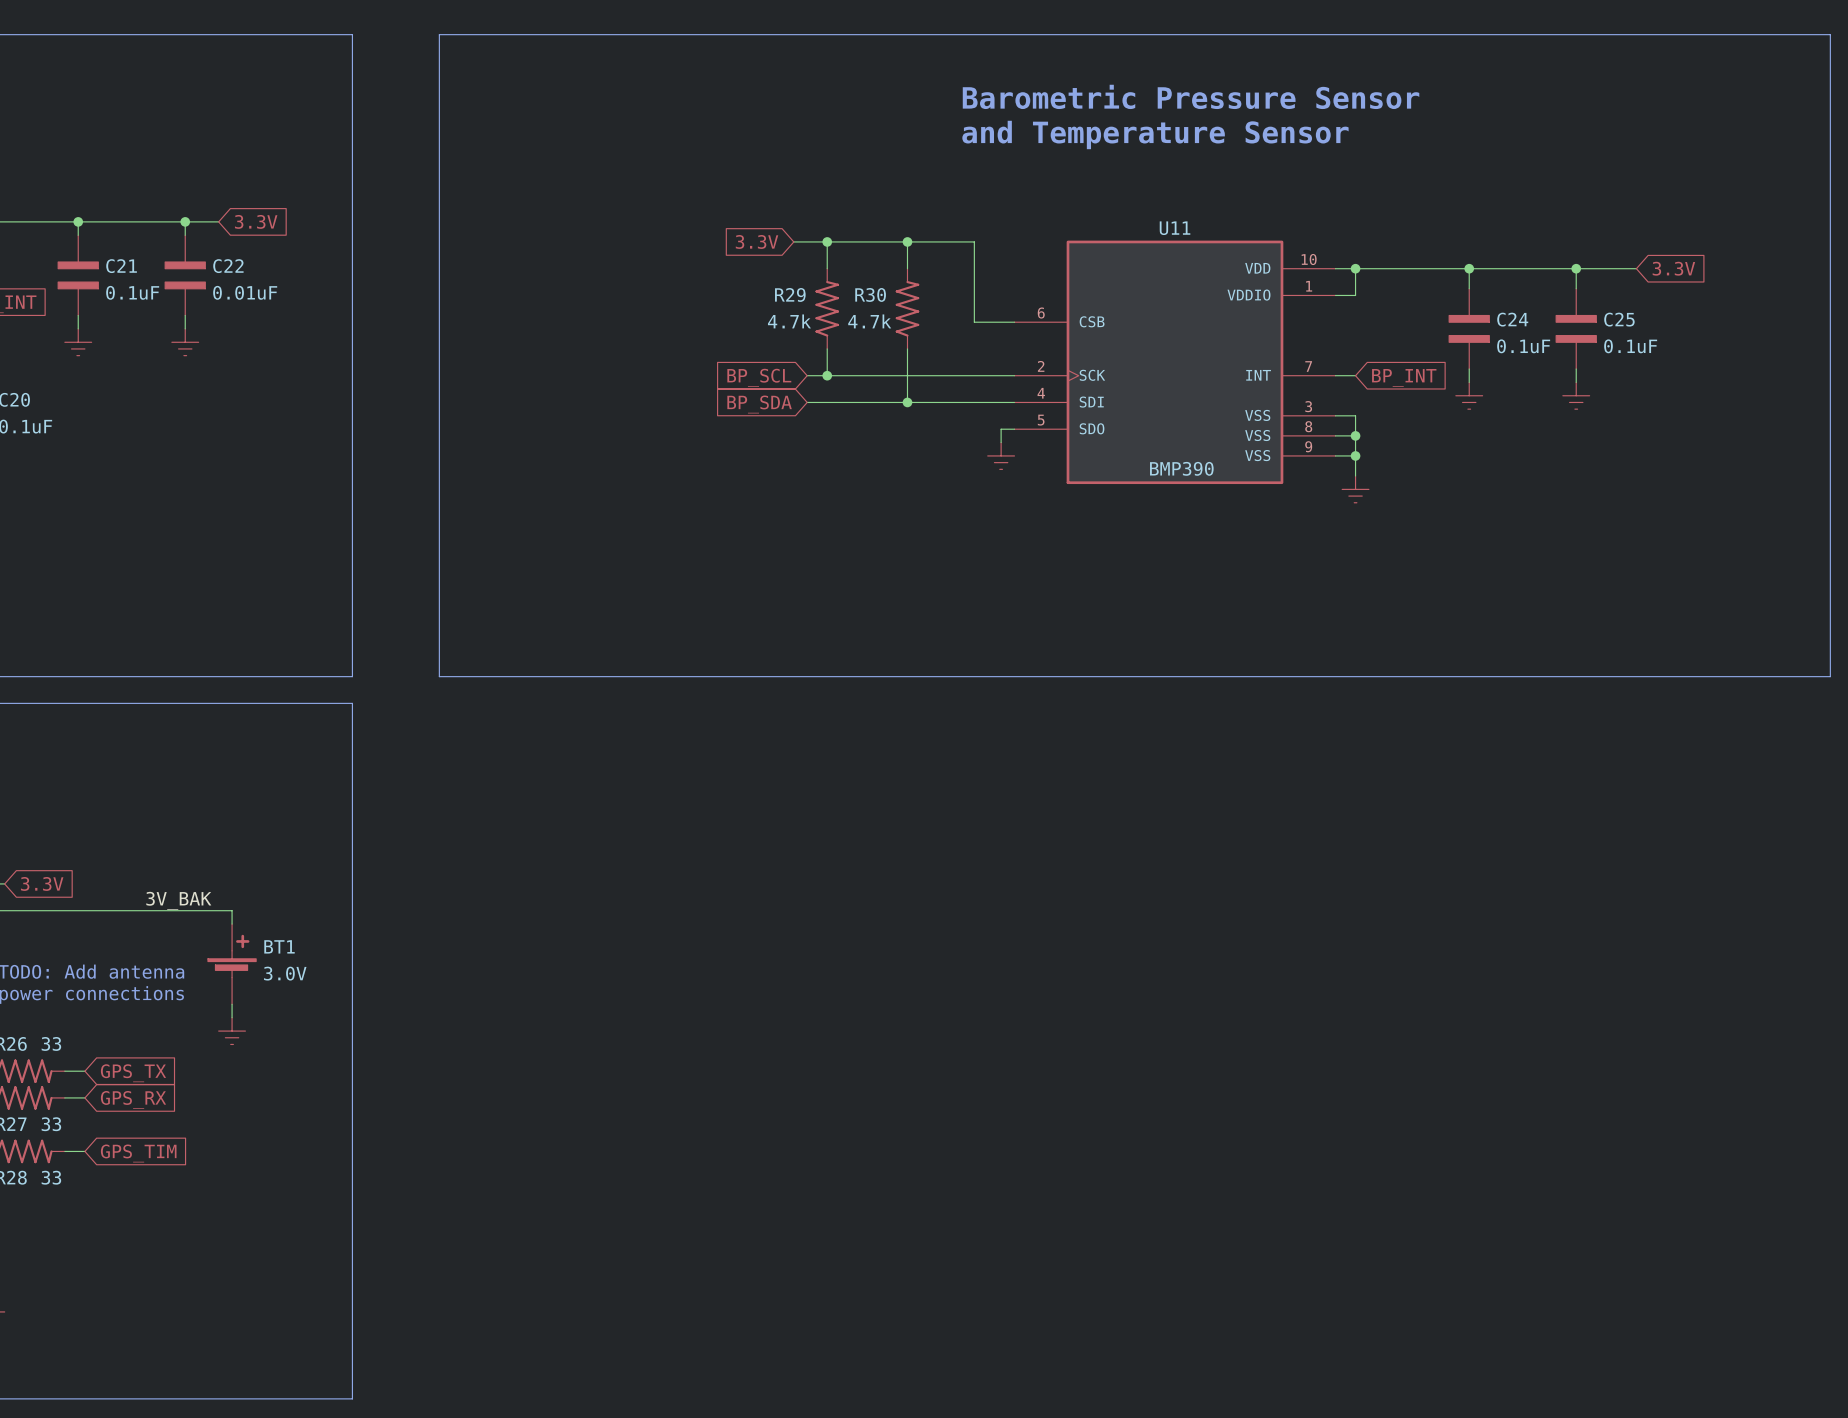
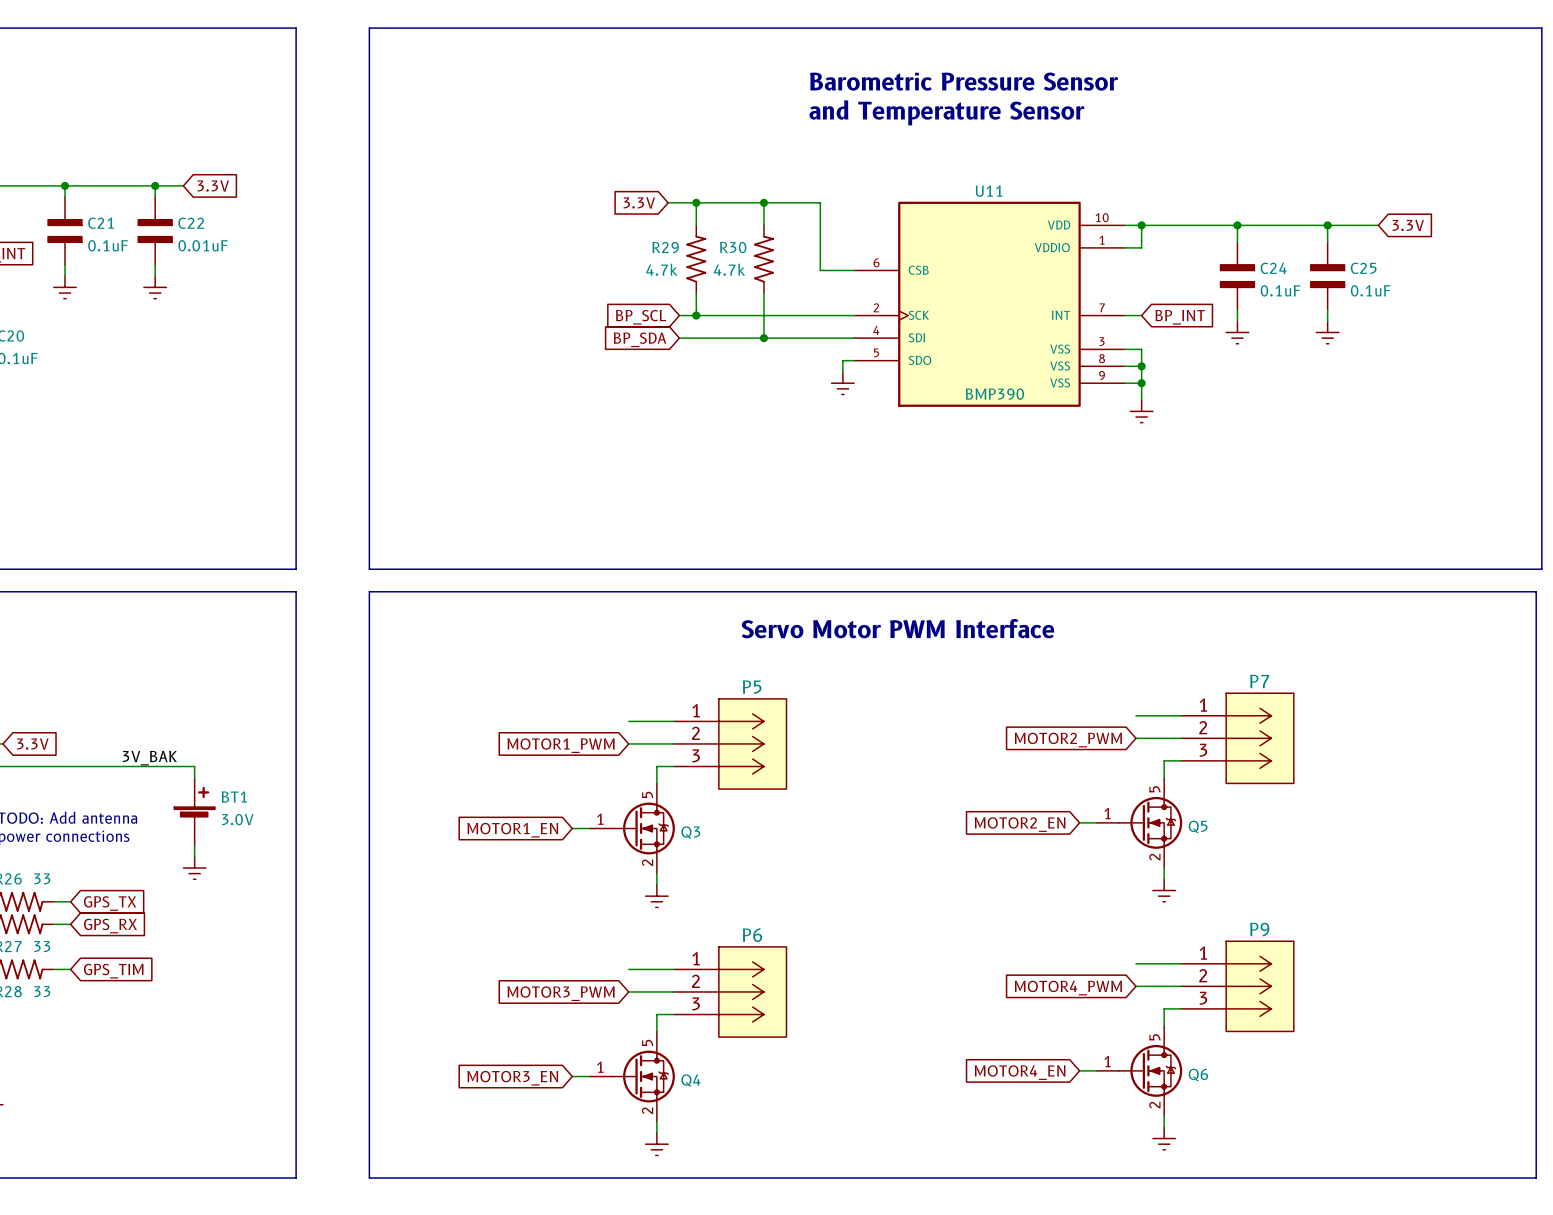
line: none -> (369, 591) (369, 1178) (1536, 1178) (1536, 591) (369, 591)
text: none -> Servo Motor PWM Interface (897, 628)
wire: none -> (1135, 715) (1181, 715)
wire: none -> (628, 721) (673, 721)
wire: none -> (1135, 738) (1181, 738)
P7: none -> (1237, 738)
global label: none -> MOTOR2_PWM (1068, 740)
wire: none -> (628, 743) (673, 743)
P5: none -> (730, 743)
global label: none -> MOTOR1_PWM (561, 745)
wire: none -> (1181, 760) (1164, 760) (1164, 777)
wire: none -> (673, 766) (656, 766) (656, 783)
wire: none -> (1079, 822) (1096, 822)
Q5: none -> (1139, 822)
global label: none -> MOTOR2_EN (1020, 824)
wire: none -> (572, 828) (589, 828)
Q3: none -> (632, 828)
global label: none -> MOTOR1_EN (512, 830)
wire: none -> (1164, 867) (1164, 879)
wire: none -> (656, 873) (656, 884)
power symbol: none -> (1164, 890)
power symbol: none -> (656, 896)
wire: none -> (1135, 963) (1181, 963)
wire: none -> (628, 969) (673, 969)
wire: none -> (1135, 986) (1181, 986)
P9: none -> (1237, 986)
global label: none -> MOTOR4_PWM (1068, 988)
wire: none -> (628, 991) (673, 991)
P6: none -> (730, 991)
global label: none -> MOTOR3_PWM (561, 993)
wire: none -> (1181, 1008) (1164, 1008) (1164, 1025)
wire: none -> (673, 1014) (656, 1014) (656, 1031)
wire: none -> (1079, 1070) (1096, 1070)
Q6: none -> (1139, 1070)
global label: none -> MOTOR4_EN (1020, 1072)
wire: none -> (572, 1076) (589, 1076)
Q4: none -> (632, 1076)
global label: none -> MOTOR3_EN (512, 1078)
wire: none -> (1164, 1116) (1164, 1127)
wire: none -> (656, 1121) (656, 1132)
power symbol: none -> (1164, 1138)
power symbol: none -> (656, 1144)

